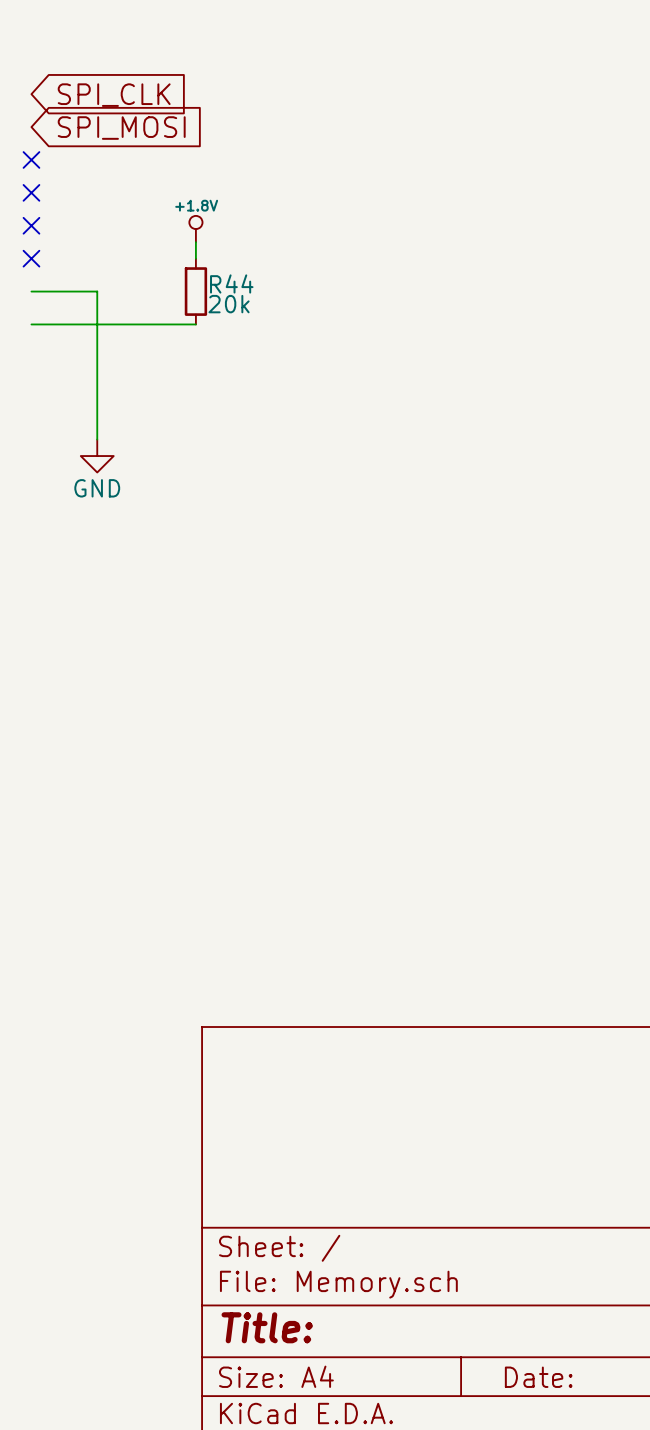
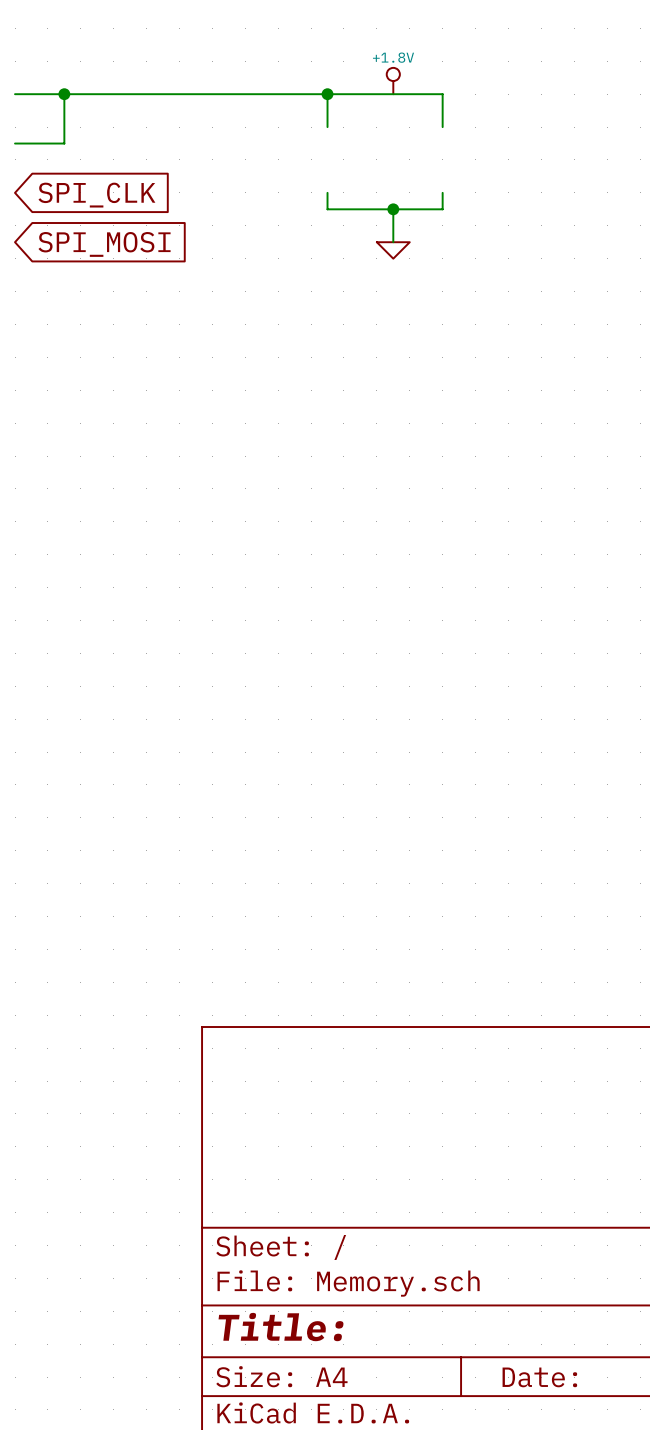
wire: none -> (15, 94) (442, 94) (442, 127)
wire: none -> (64, 94) (64, 143) (15, 143)
junction: none -> (64, 94)
wire: none -> (327, 94) (327, 127)
junction: none -> (327, 94)
global label position: SPI_CLK (114, 95) -> SPI_CLK (96, 195)
global label position: SPI_MOSI (121, 128) -> SPI_MOSI (104, 244)
no-connect mark: (31, 159) -> none
no-connect mark: (31, 192) -> none
wire: none -> (327, 192) (327, 209) (442, 209) (442, 192)
wire: none -> (393, 209) (393, 242)
junction: none -> (393, 209)
no-connect mark: (31, 225) -> none
power symbol position: +1.8V (195, 229) -> +1.8V (393, 81)
wire: (195, 242) (195, 258) -> none
power symbol: none -> (393, 250)
no-connect mark: (31, 258) -> none
wire: (31, 291) (97, 291) (97, 439) -> none
R44: 20k (195, 291) -> none
wire: (31, 324) (195, 324) -> none
power symbol: GND (97, 456) -> none

